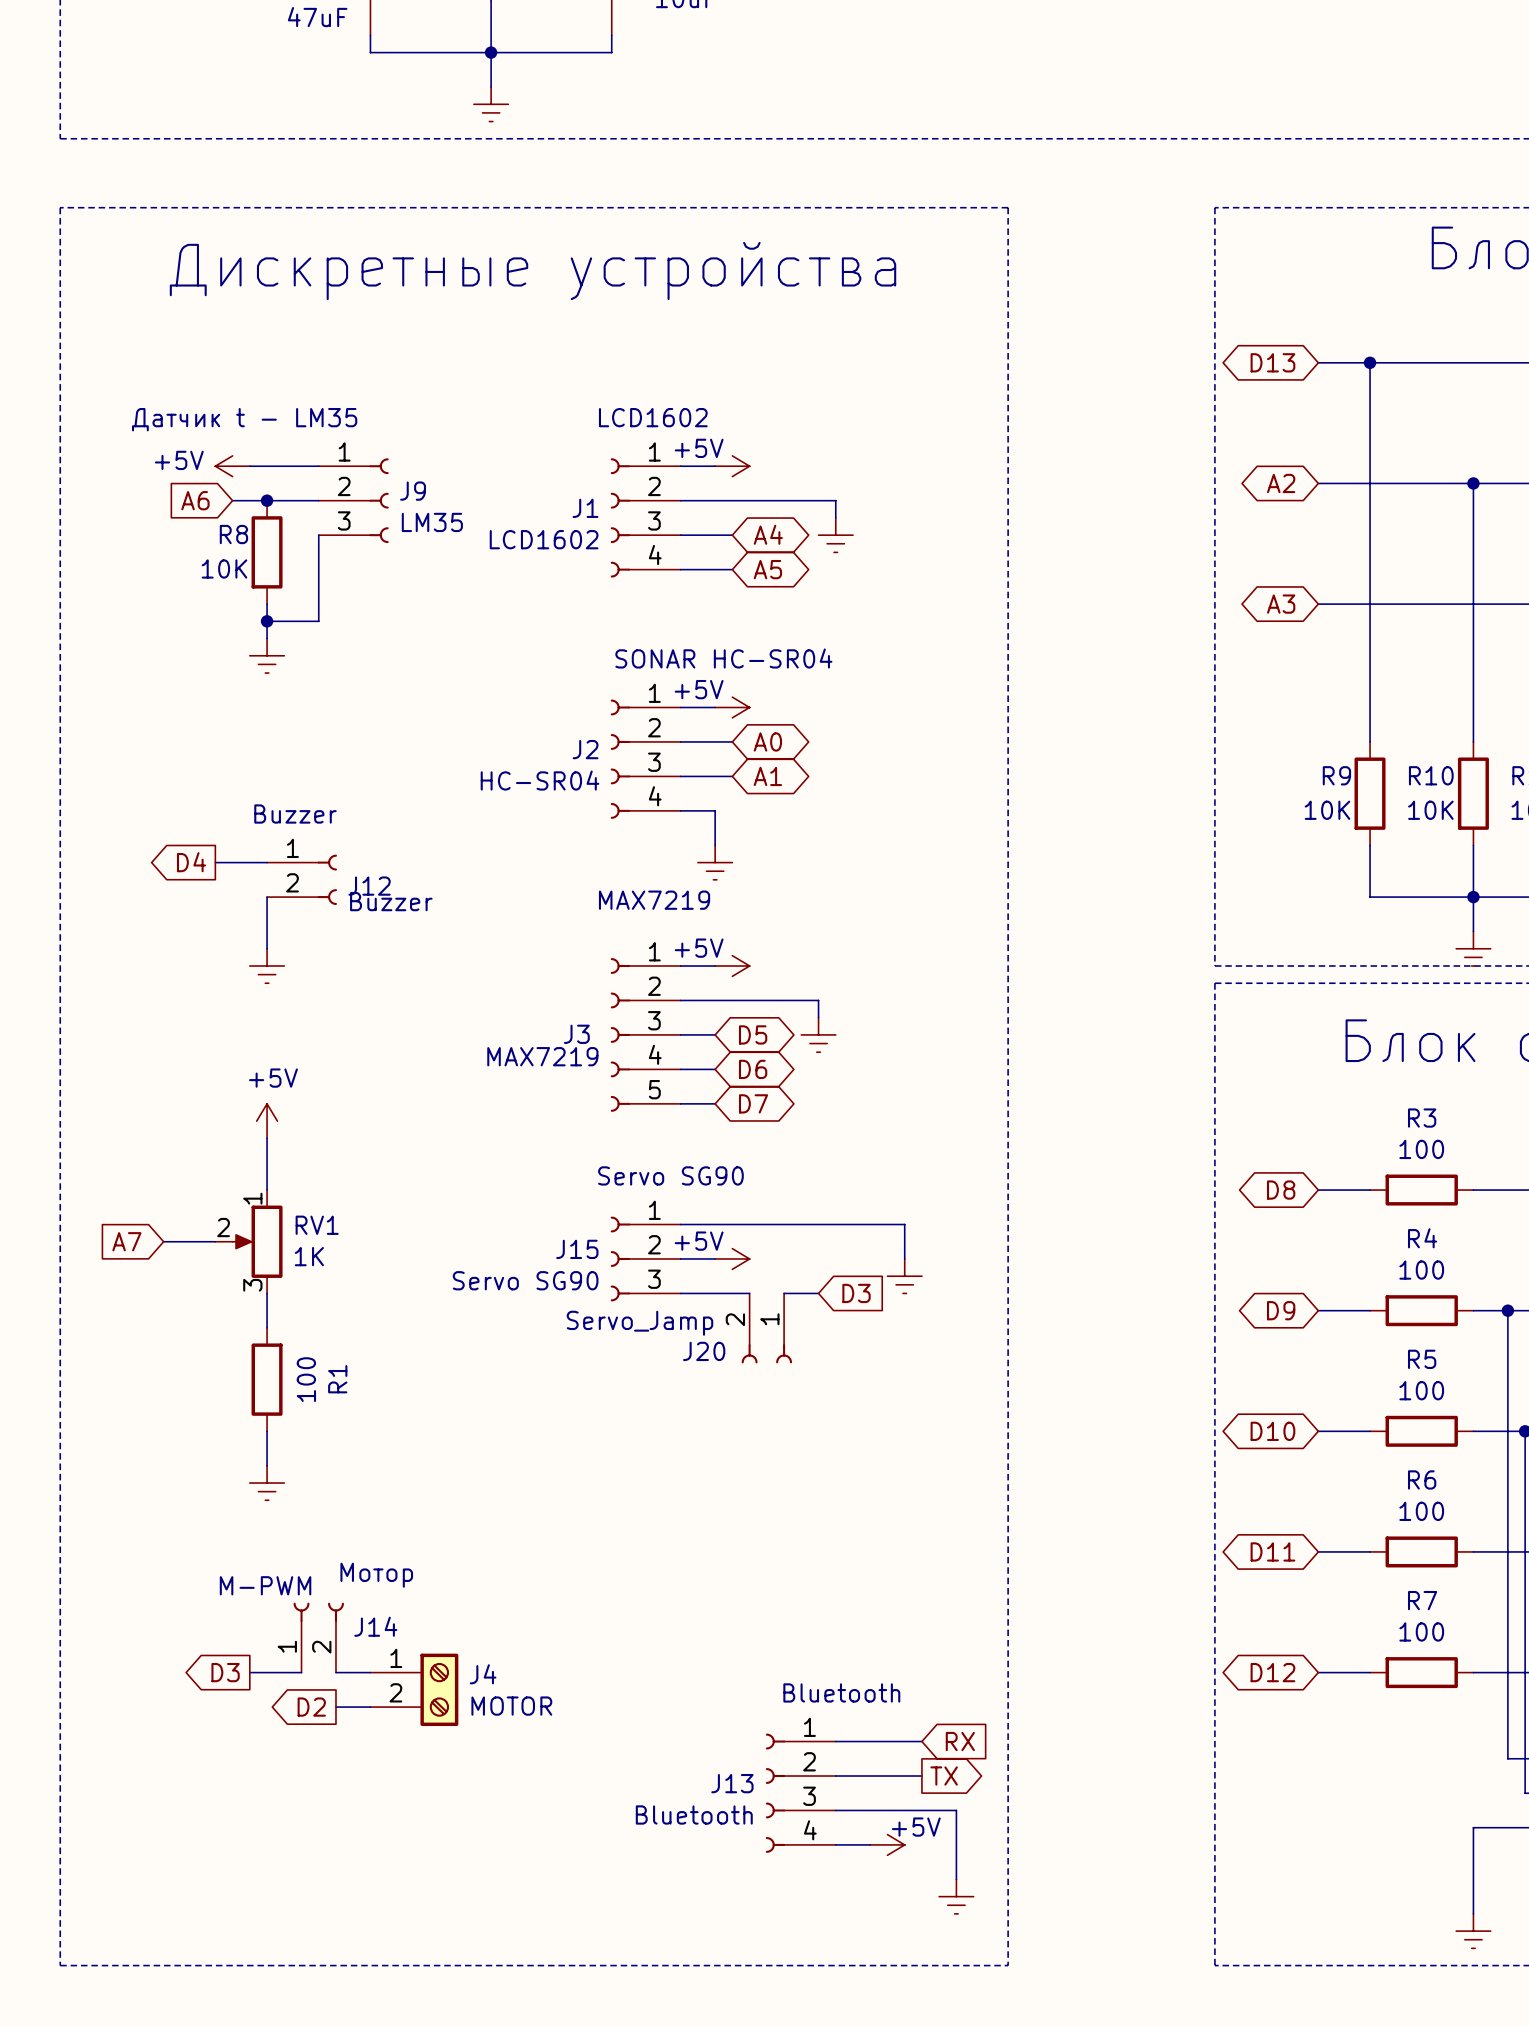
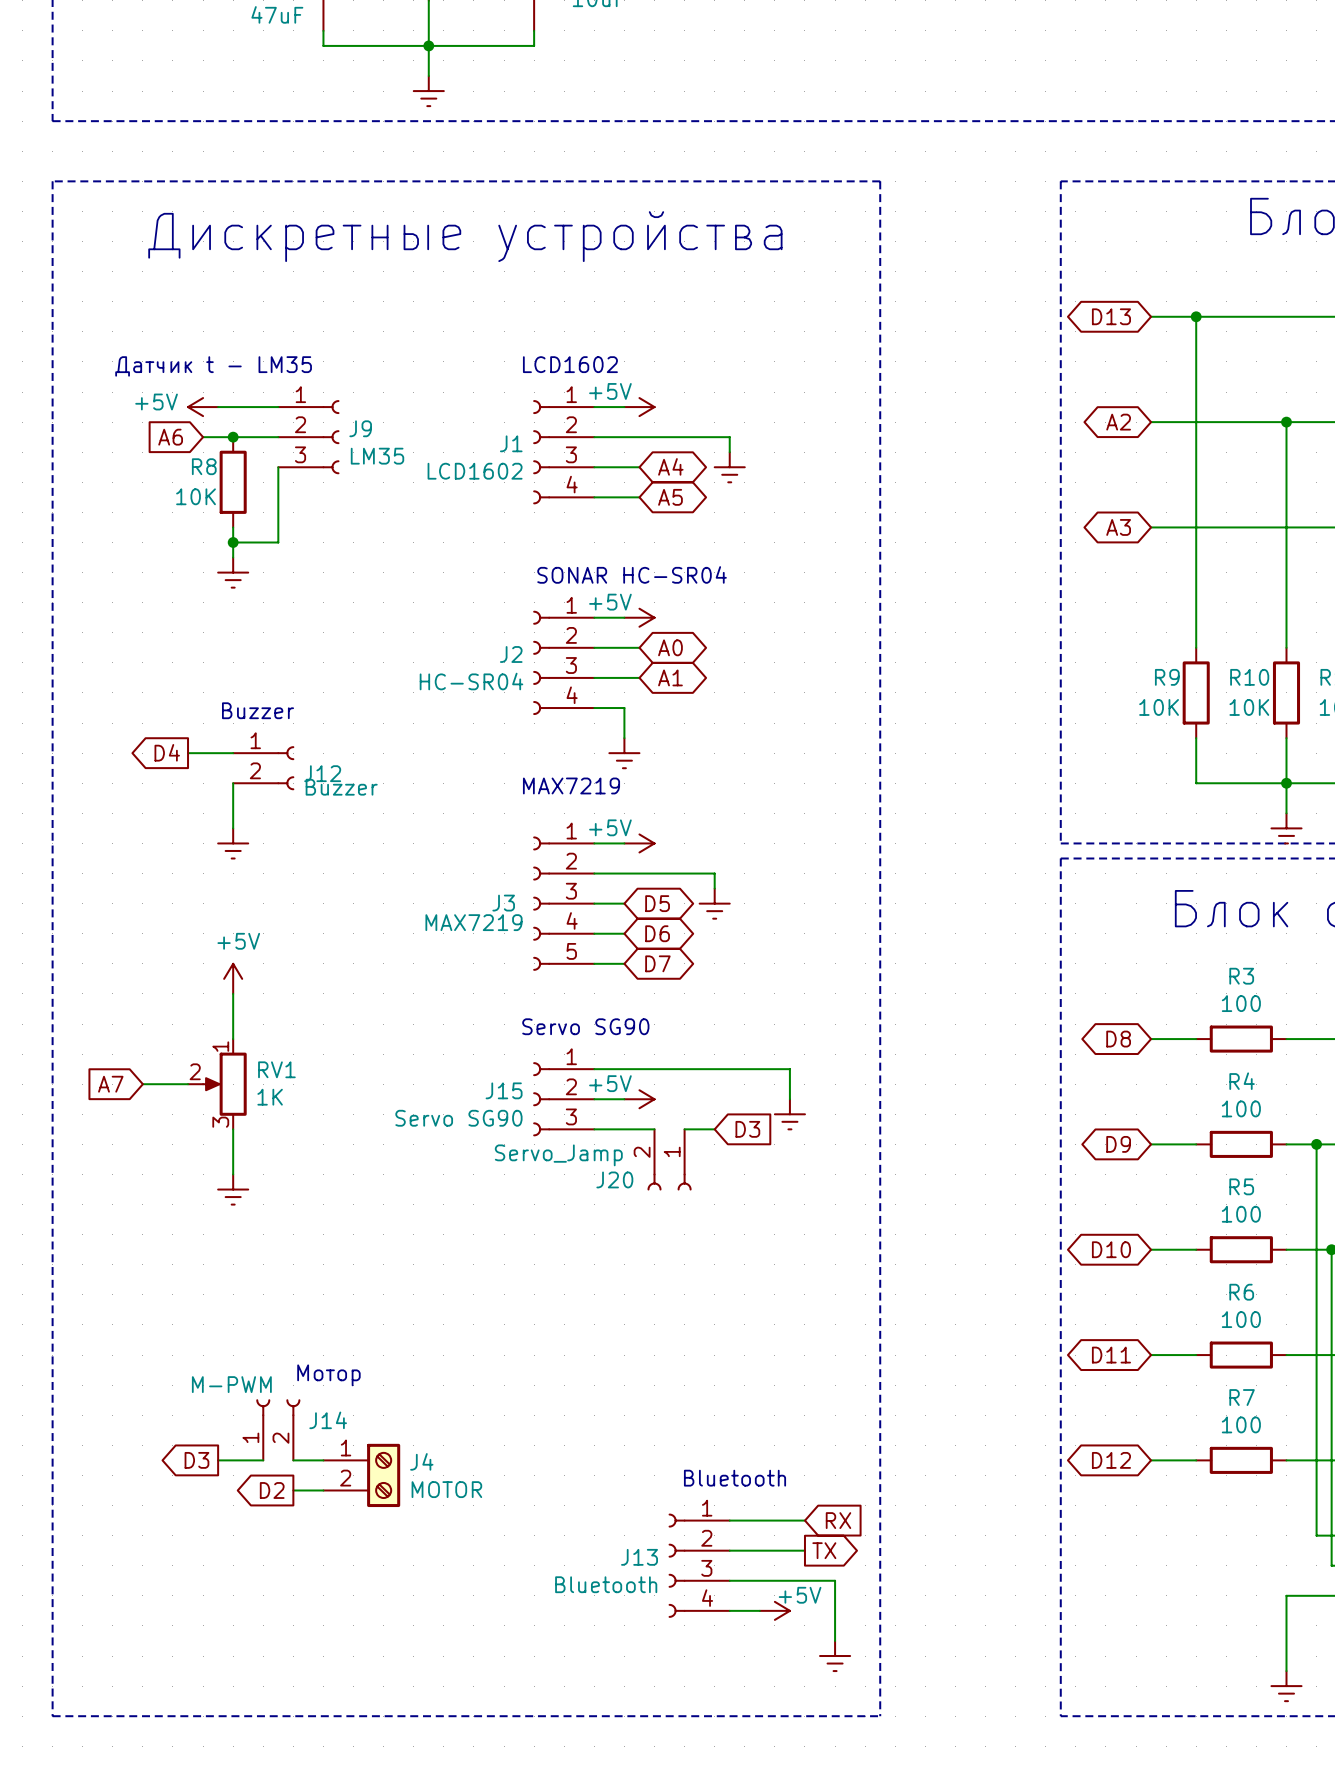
R1: 100 (267, 1379) -> none
wire: (267, 1431) (267, 1465) -> none
power symbol position: (267, 1483) -> (233, 1189)

